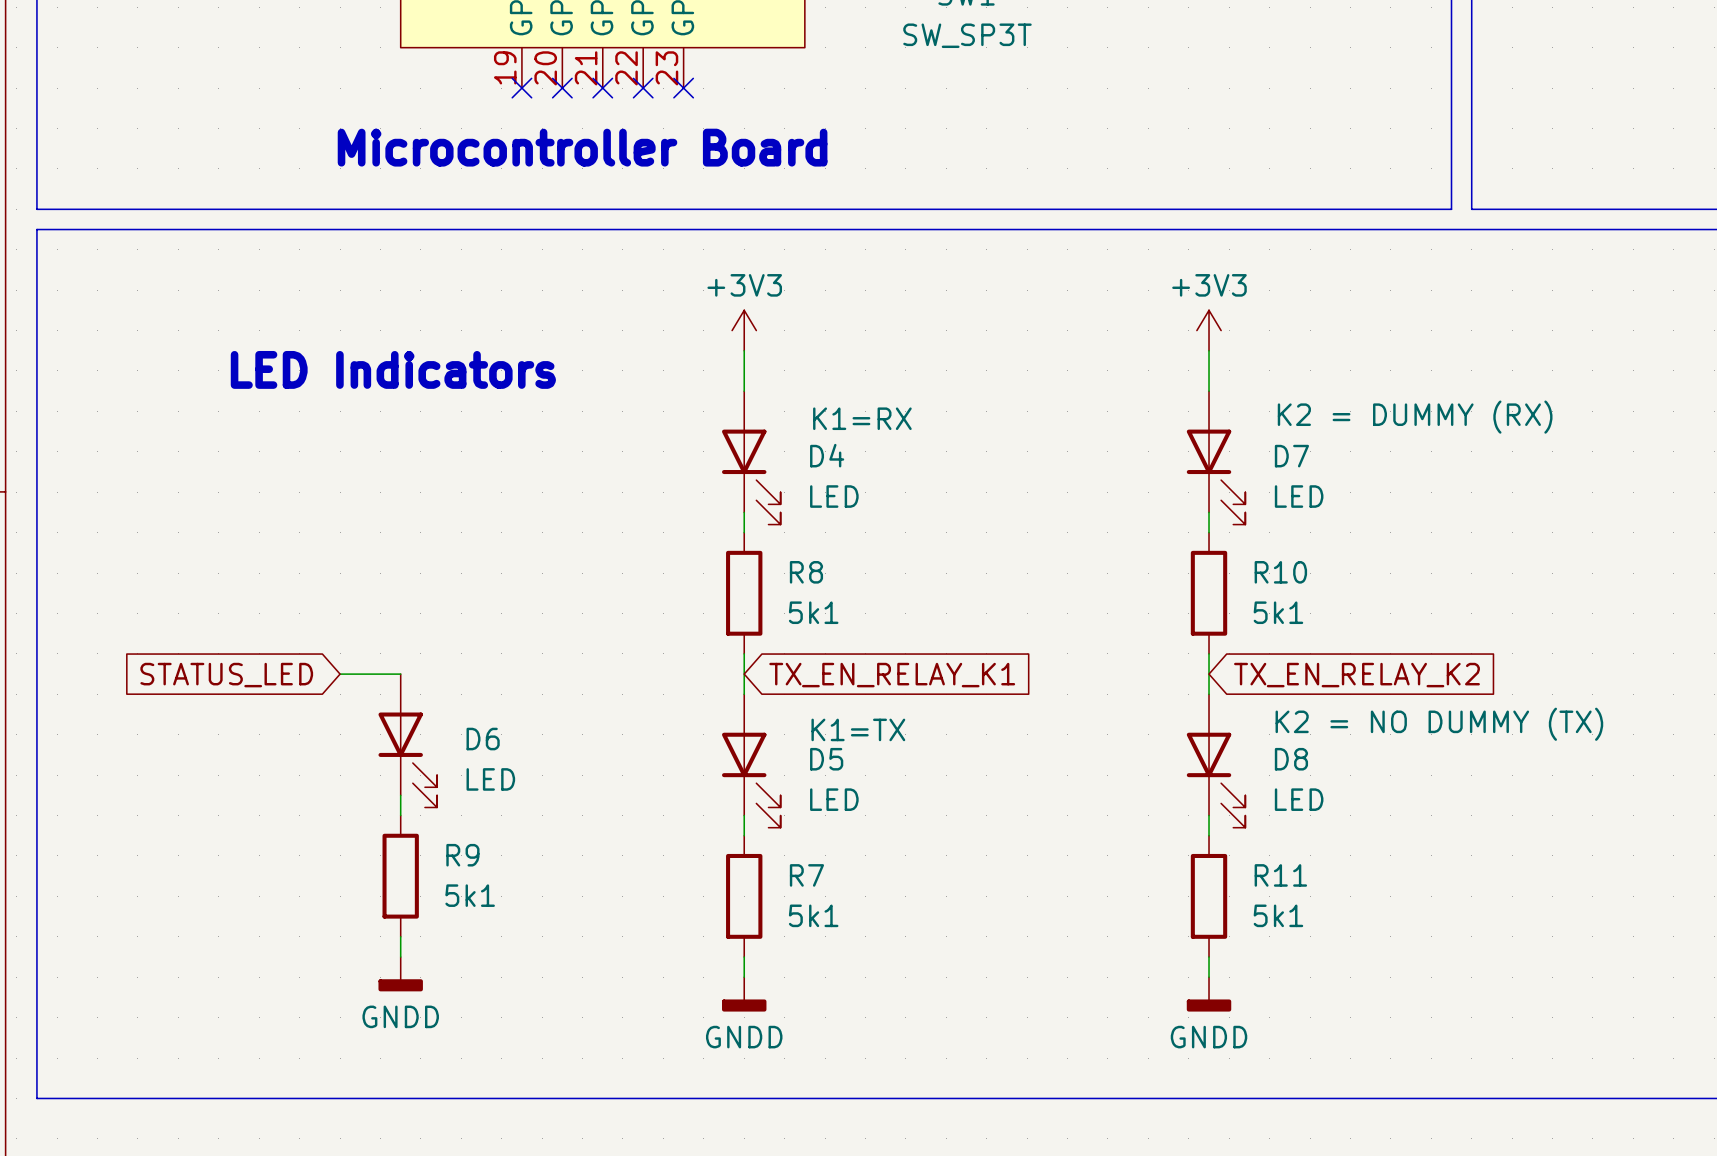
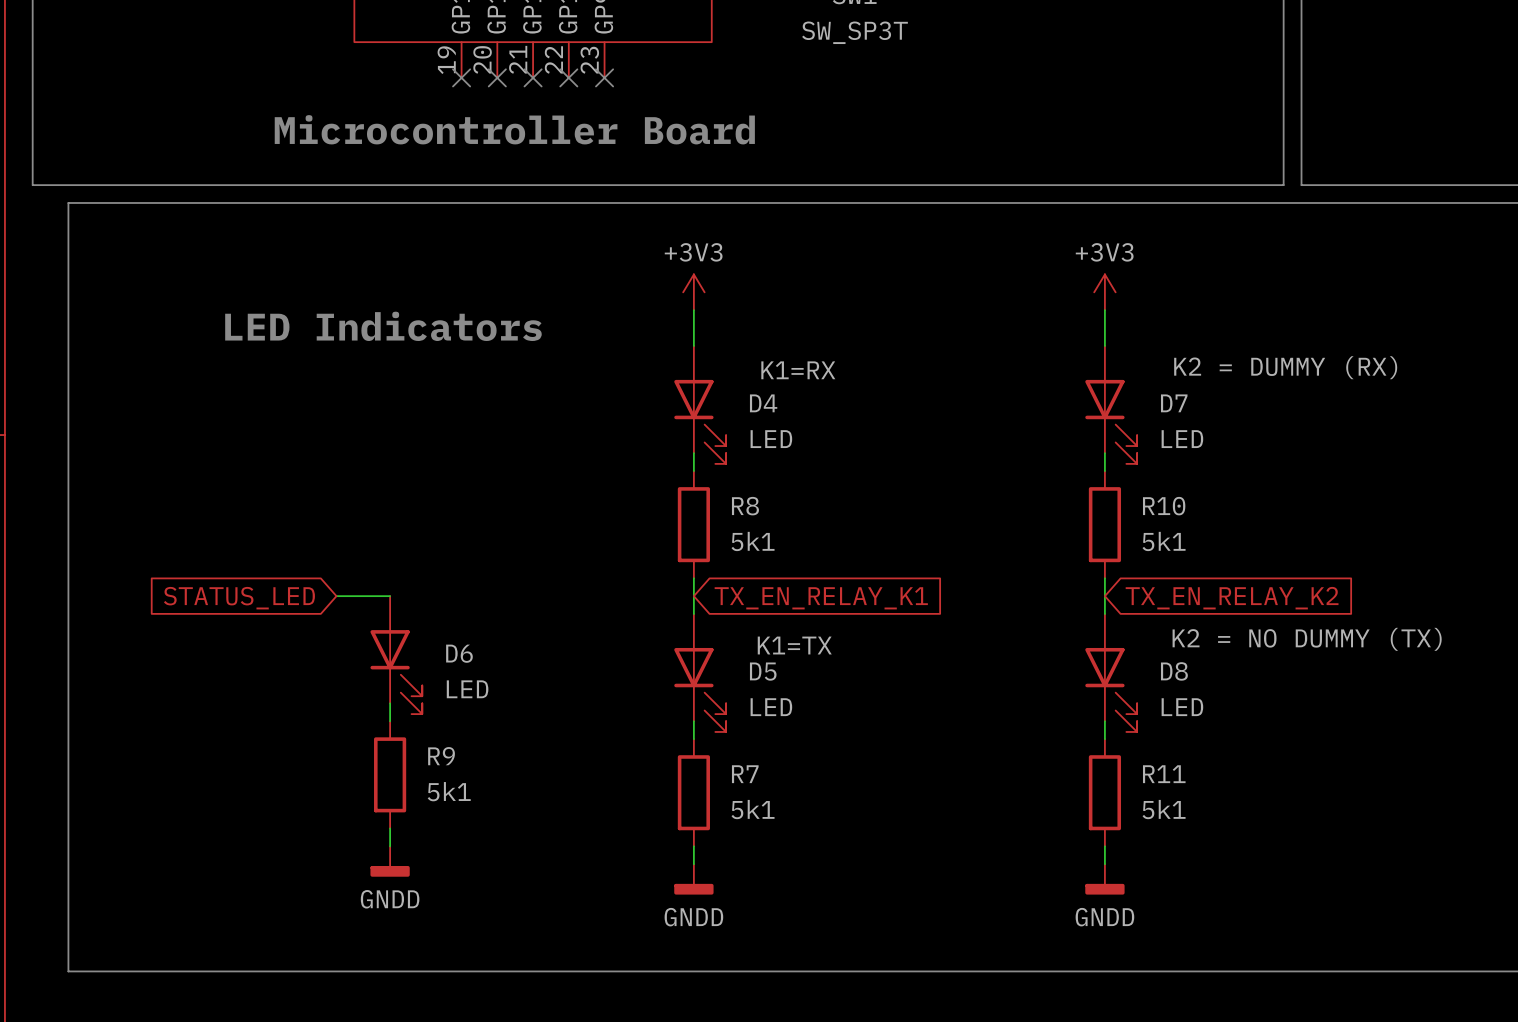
line: (77, 229) (36, 229) (36, 1098) (77, 1098) -> (68, 202) (68, 971)
power symbol position: +3V3 (744, 330) -> +3V3 (693, 292)
power symbol position: +3V3 (1209, 330) -> +3V3 (1104, 292)
wire: (744, 350) (744, 391) -> (693, 310) (693, 345)
wire: (1209, 350) (1209, 391) -> (1104, 310) (1104, 345)
text position: LED Indicators (393, 369) -> LED Indicators (383, 326)
D4 position: (751, 457) -> (700, 404)
D7 position: (1216, 457) -> (1111, 404)
wire: (744, 512) (744, 532) -> (693, 453) (693, 471)
wire: (1209, 512) (1209, 532) -> (1104, 453) (1104, 471)
R8 position: (744, 593) -> (693, 524)
R10 position: (1209, 593) -> (1104, 524)
wire: (744, 653) (744, 694) -> (693, 578) (693, 614)
wire: (1209, 653) (1209, 694) -> (1104, 578) (1104, 614)
wire: (340, 674) (380, 674) -> (354, 596) (390, 596)
global label position: STATUS_LED (226, 675) -> STATUS_LED (239, 598)
global label position: TX_EN_RELAY_K1 (892, 675) -> TX_EN_RELAY_K1 (821, 598)
global label position: TX_EN_RELAY_K2 (1356, 675) -> TX_EN_RELAY_K2 (1232, 598)
D6 position: (407, 740) -> (396, 655)
D5 position: (751, 761) -> (700, 672)
D8 position: (1216, 761) -> (1111, 672)
wire: (400, 795) (400, 815) -> (390, 703) (390, 721)
wire: (744, 815) (744, 835) -> (693, 721) (693, 739)
wire: (1209, 815) (1209, 835) -> (1104, 721) (1104, 739)
R9 position: (400, 876) -> (390, 774)
R7 position: (744, 896) -> (693, 792)
R11 position: (1209, 896) -> (1104, 792)
wire: (400, 936) (400, 957) -> (390, 828) (390, 846)
wire: (744, 957) (744, 977) -> (693, 846) (693, 864)
wire: (1209, 957) (1209, 977) -> (1104, 846) (1104, 864)
power symbol position: GNDD (400, 974) -> GNDD (390, 861)
power symbol position: GNDD (744, 994) -> GNDD (693, 879)
power symbol position: GNDD (1209, 994) -> GNDD (1104, 879)

